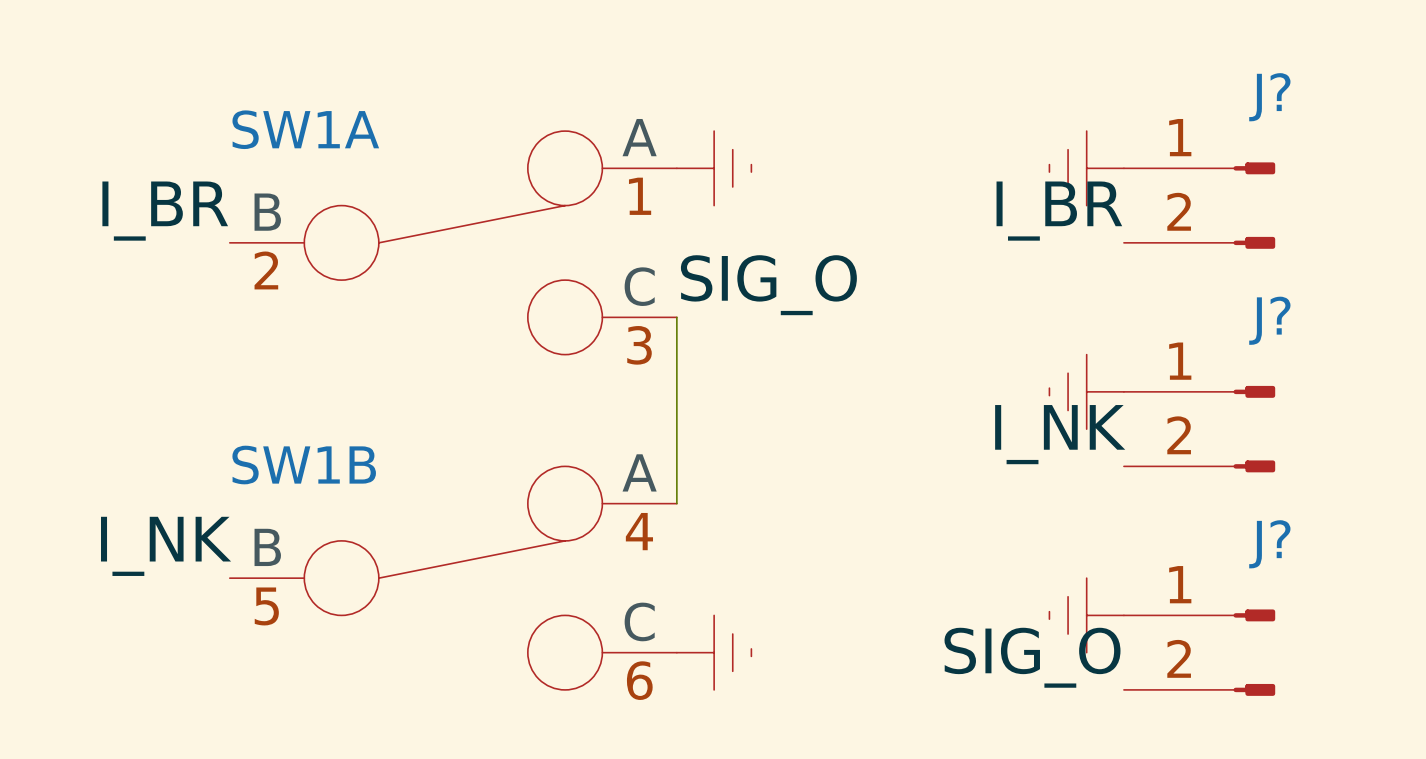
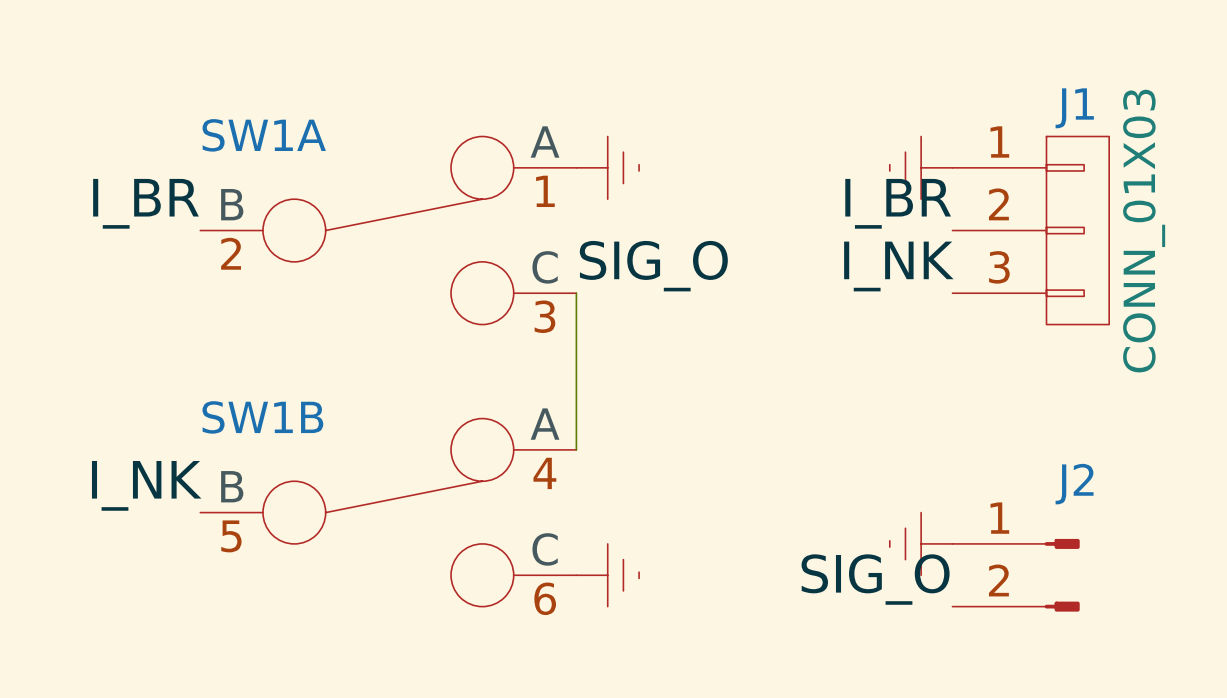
J?: (1199, 205) -> none
J1: none -> CONN_01X03 (1030, 230)
power symbol: (1086, 391) -> none
J?: (1199, 429) -> none
label position: I_NK (1060, 434) -> I_NK (898, 266)
J? name: J? (1269, 544) -> J2 (1074, 484)

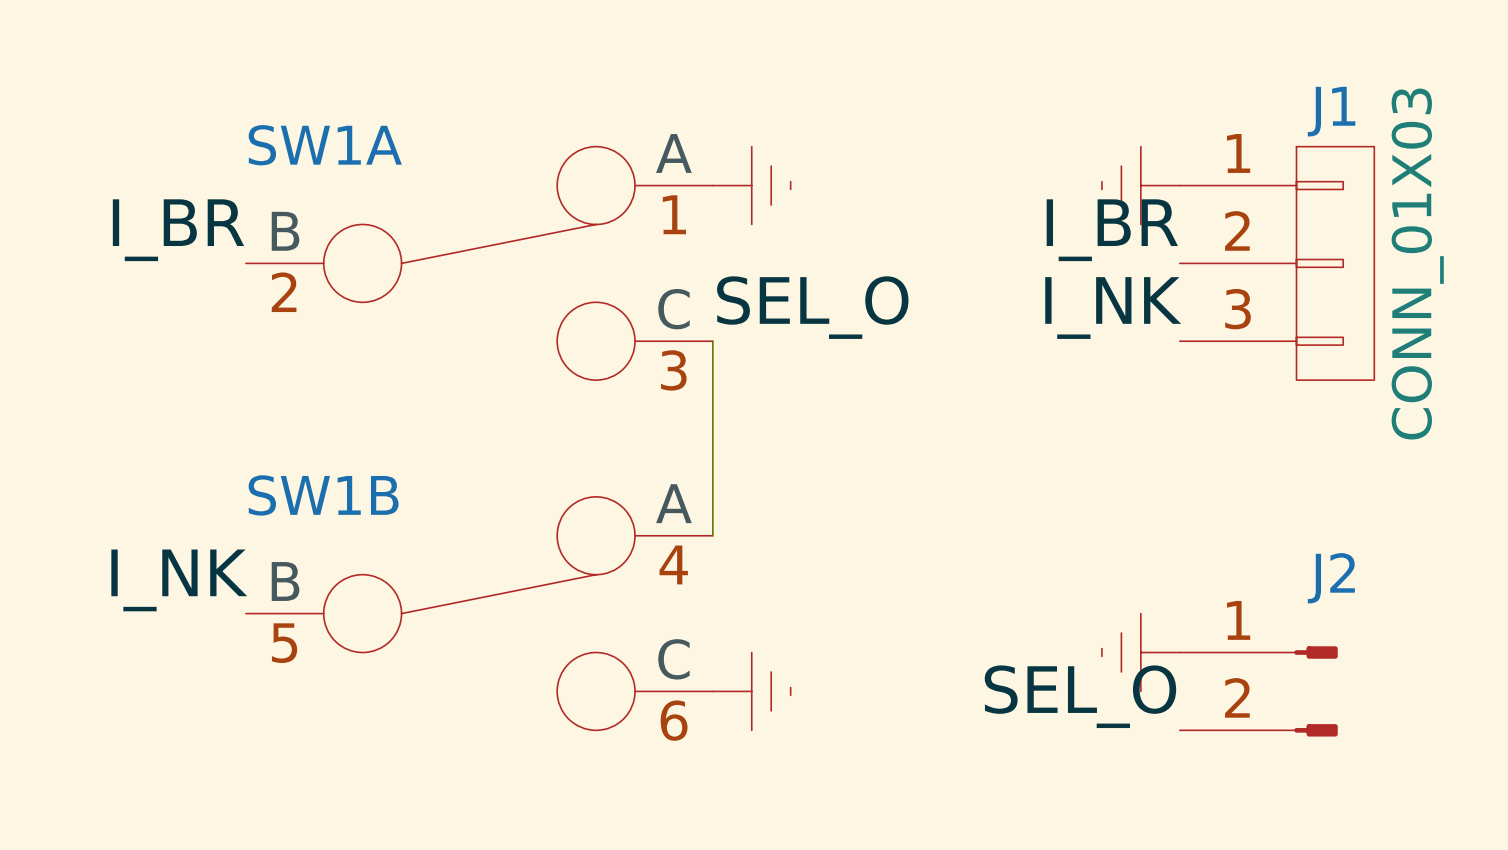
label: SIG_O (653, 266) -> SEL_O (812, 307)
label: SIG_O (875, 579) -> SEL_O (1080, 696)

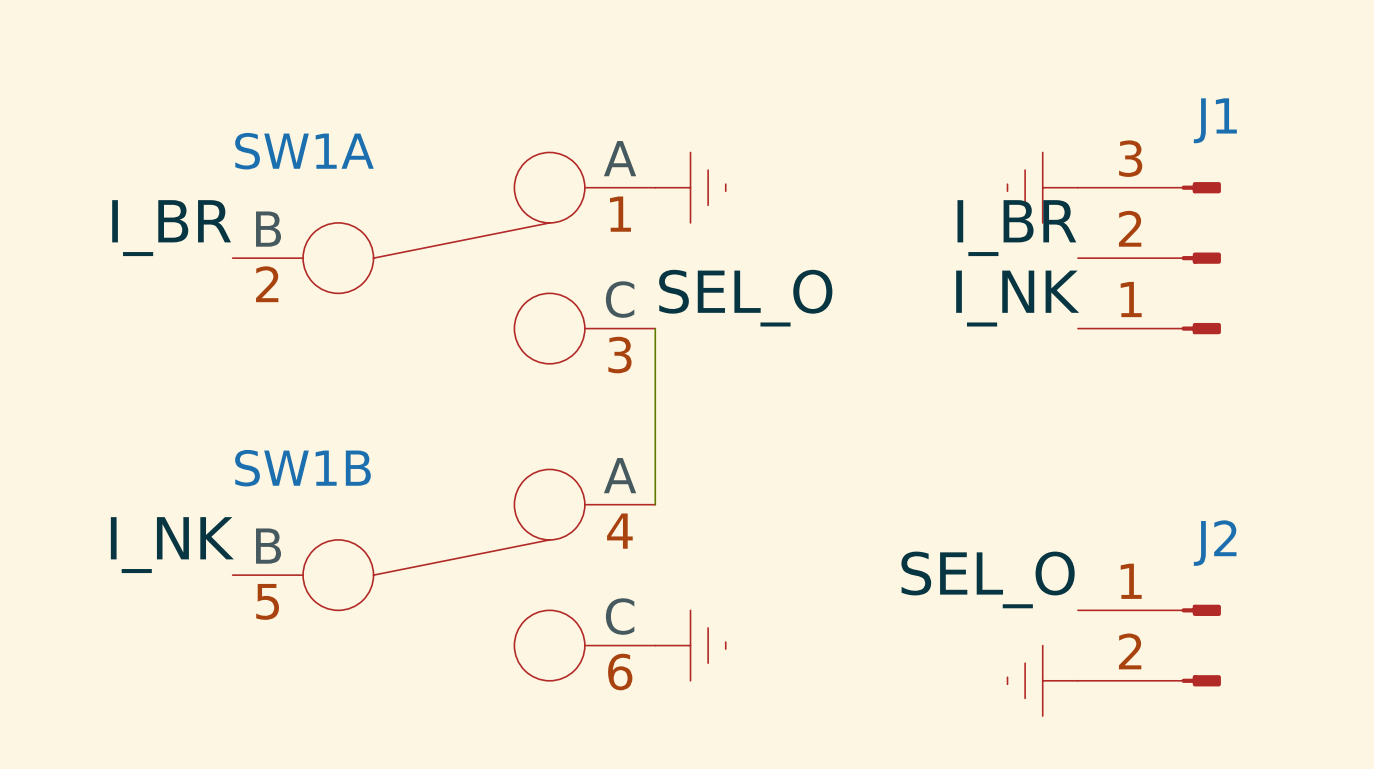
J1 symbol: [1179, 146, 1375, 381] -> [1077, 182, 1221, 335]
J1 value: CONN_01X03 (1417, 264) -> none
power symbol position: (1140, 652) -> (1042, 680)
label position: SEL_O (1080, 696) -> SEL_O (988, 579)

